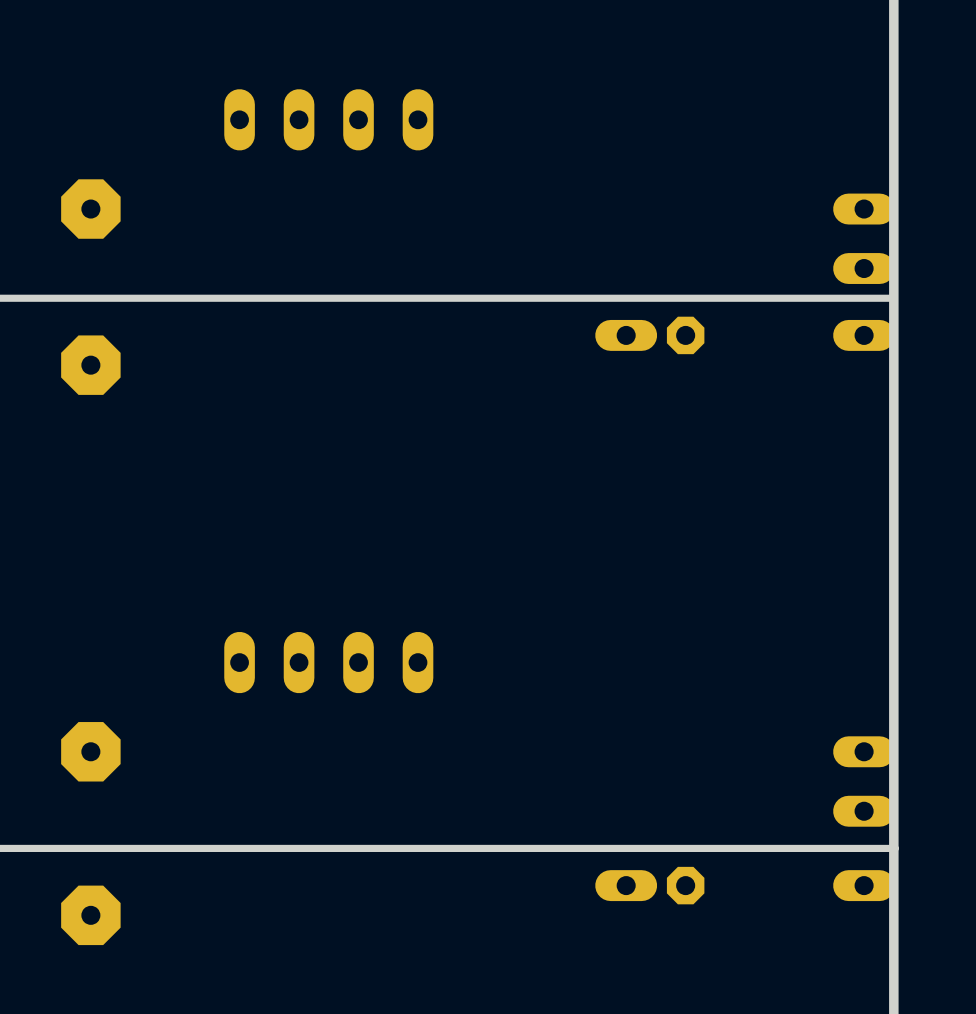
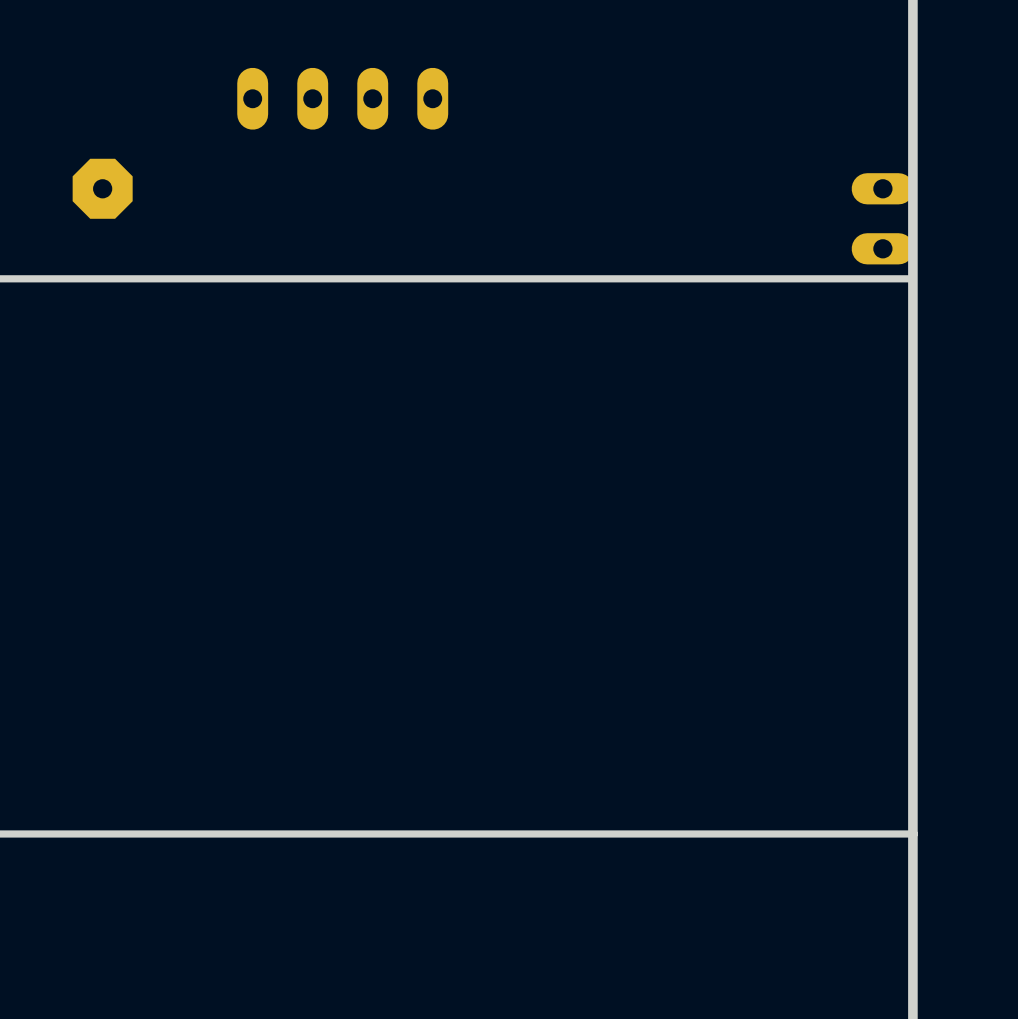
part: (626, 335) -> none
part: (685, 335) -> none
part: (864, 335) -> none
part: (90, 365) -> none
part: (328, 662) -> none
part: (90, 751) -> none
part: (864, 751) -> none
part: (864, 811) -> none
part: (626, 885) -> none
part: (685, 885) -> none
part: (864, 885) -> none
part: (90, 915) -> none

